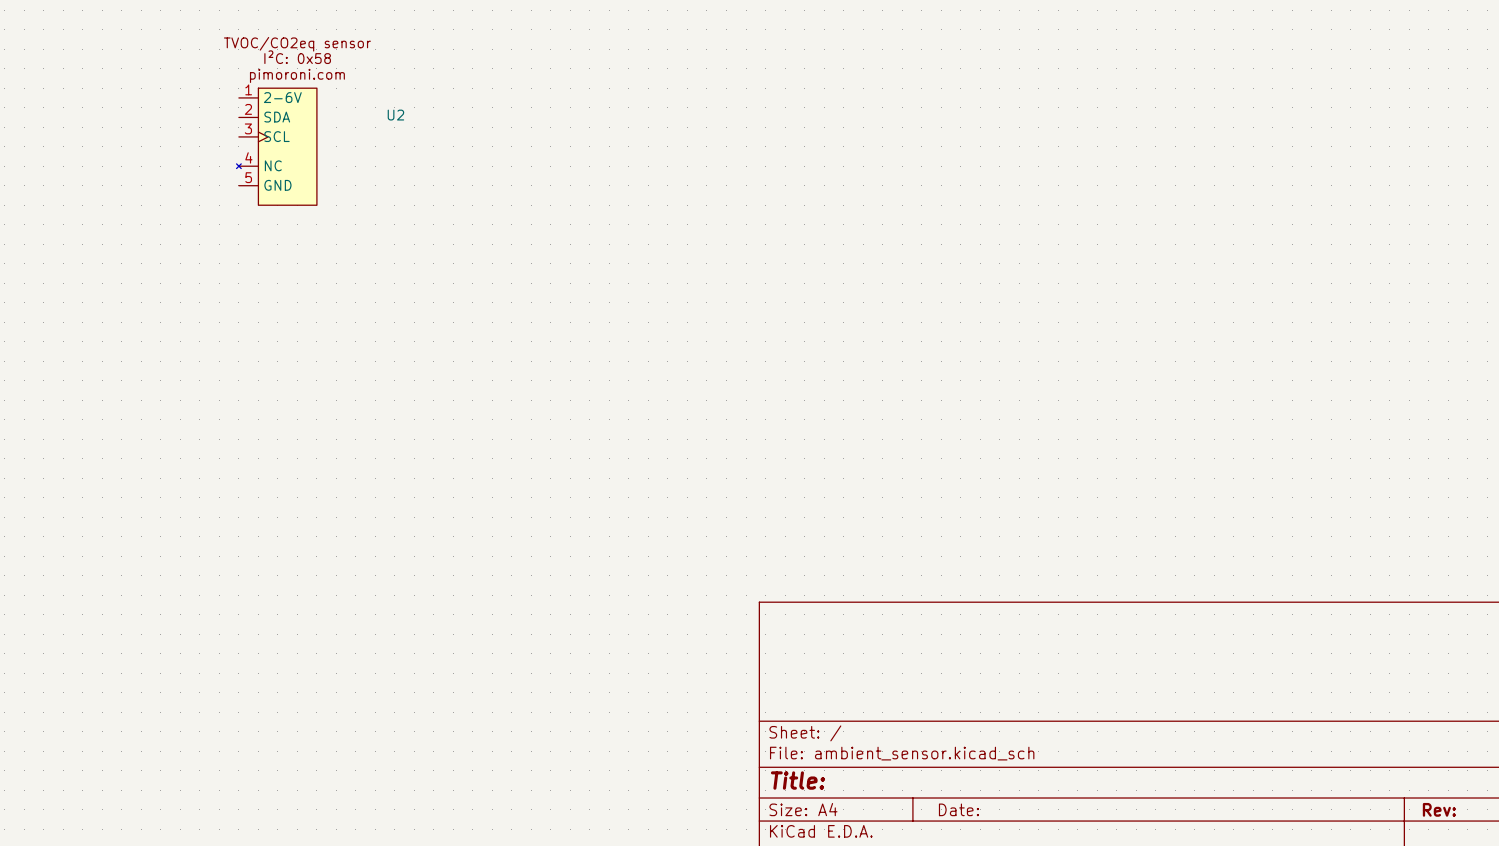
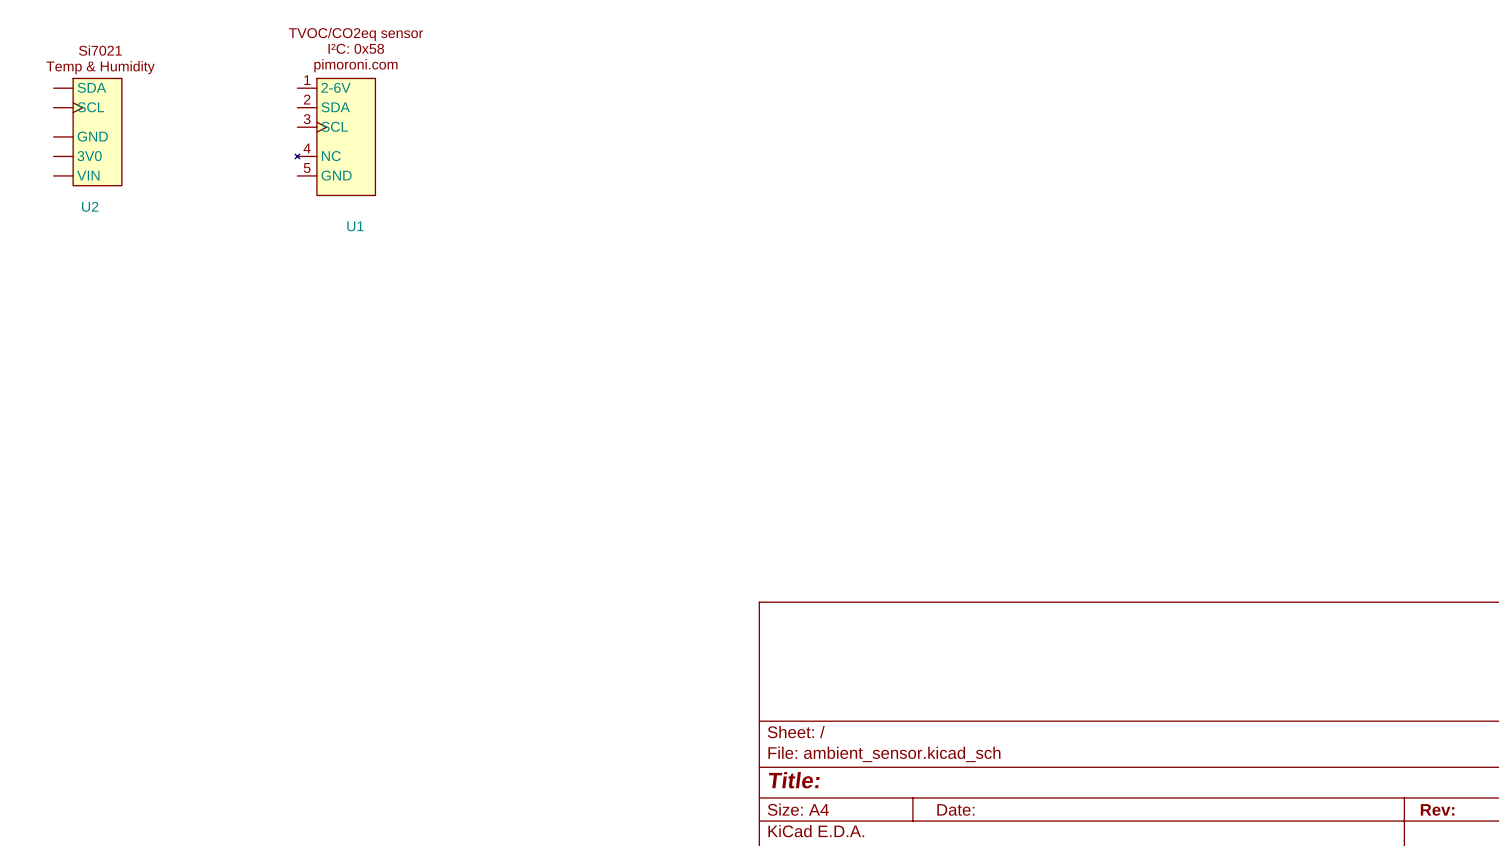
U2 symbol: [236, 88, 317, 206] -> [53, 78, 122, 186]
U2 name position: U2 (395, 115) -> U2 (90, 206)
U1: none -> (335, 136)

